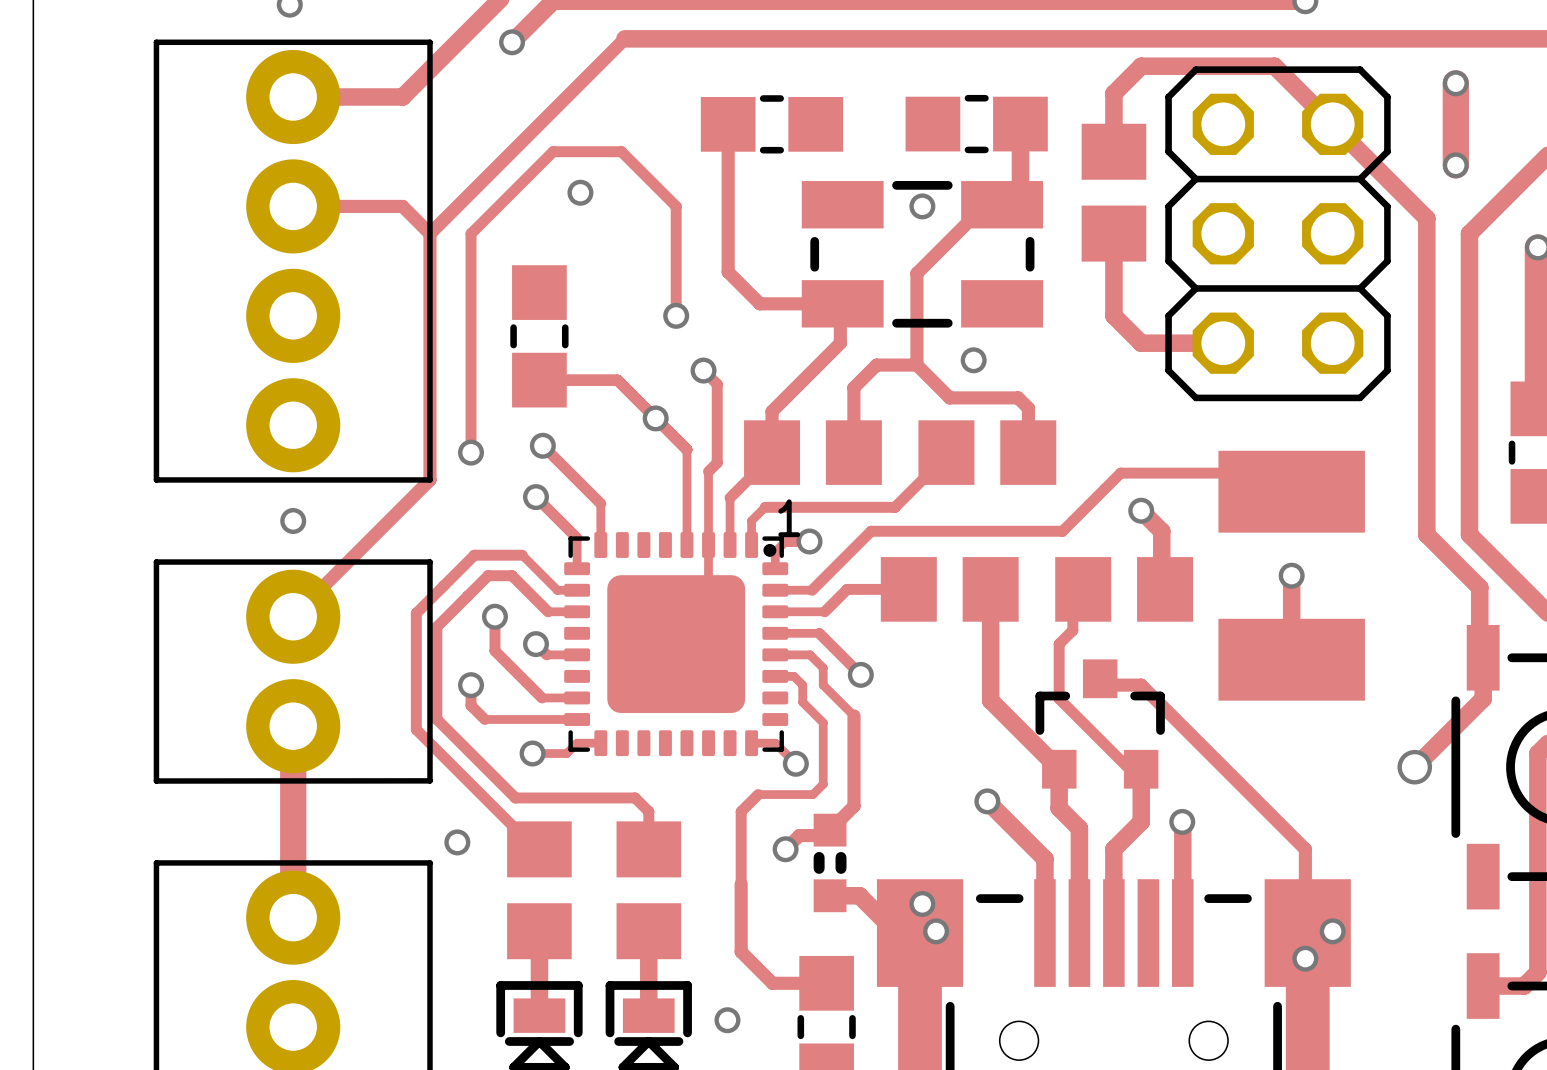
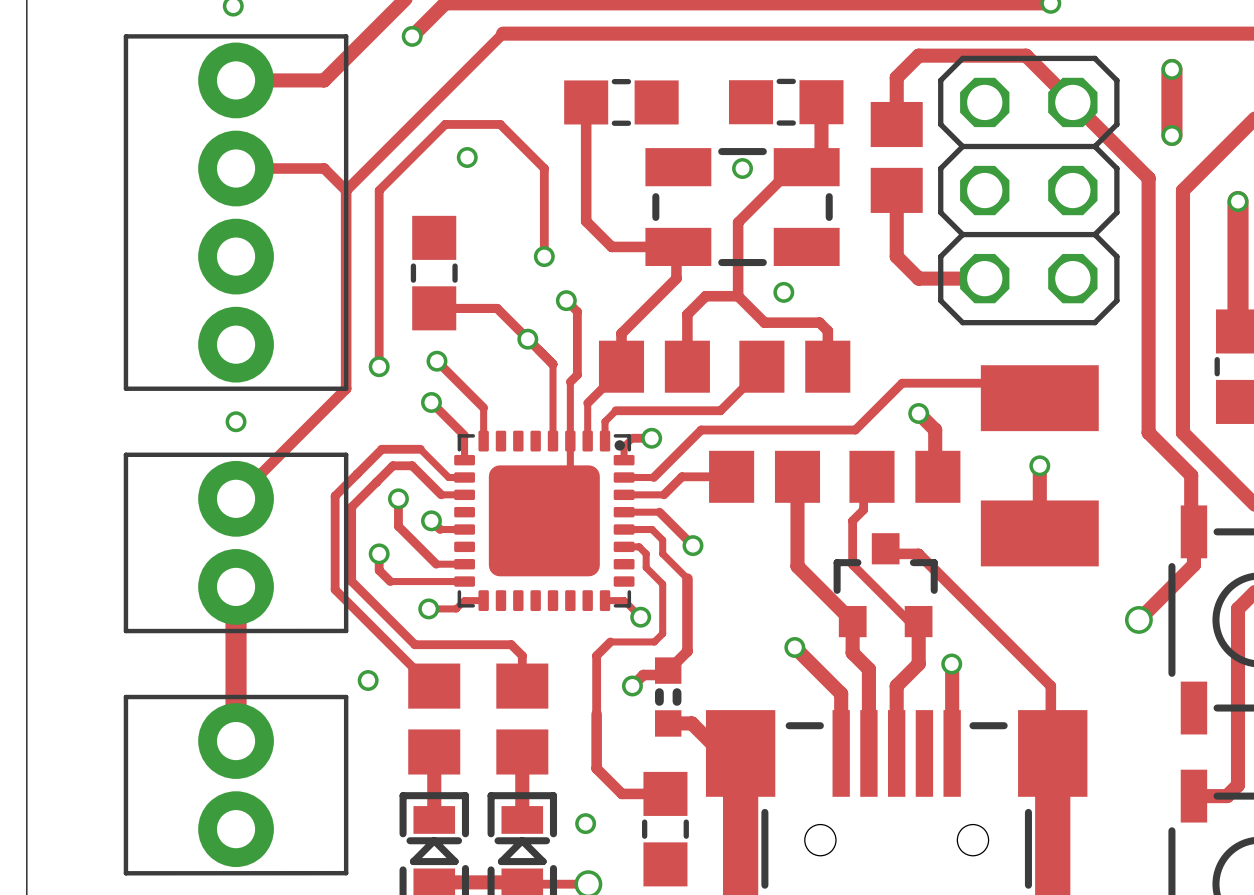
text: 1 (789, 518) -> none
via: (922, 903) -> none
via: (936, 931) -> none
via: (1332, 931) -> none
via: (1305, 958) -> none

